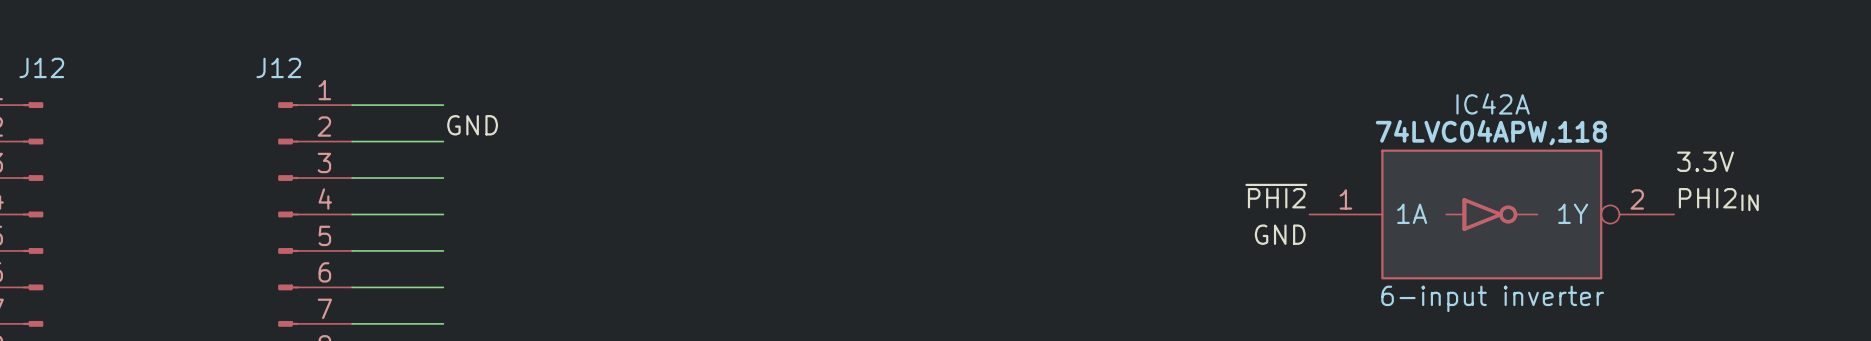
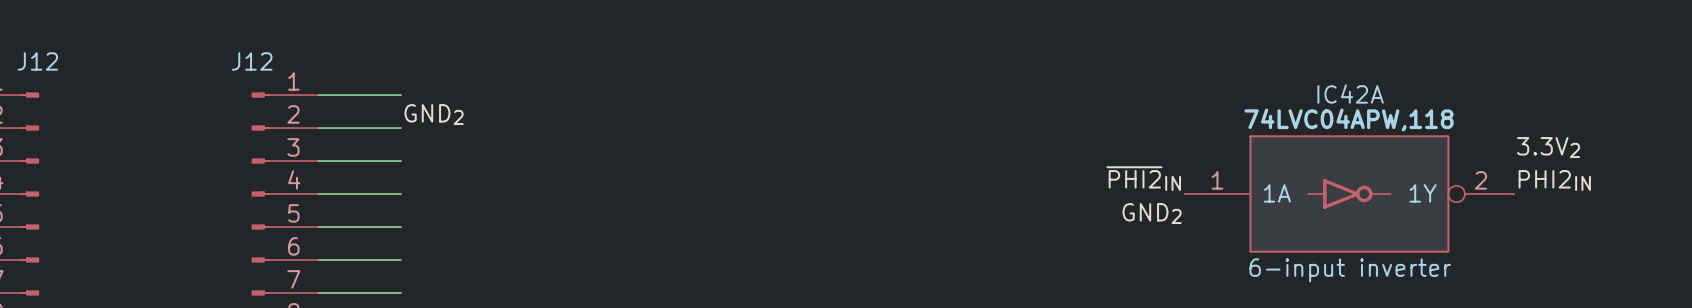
label: GND (472, 125) -> GND2 (434, 114)
label: 3.3V (1705, 161) -> 3.3V2 (1548, 147)
label: ~{PHI2} (1276, 196) -> ~{PHI2}IN (1143, 178)
label: GND (1280, 234) -> GND2 (1152, 213)

